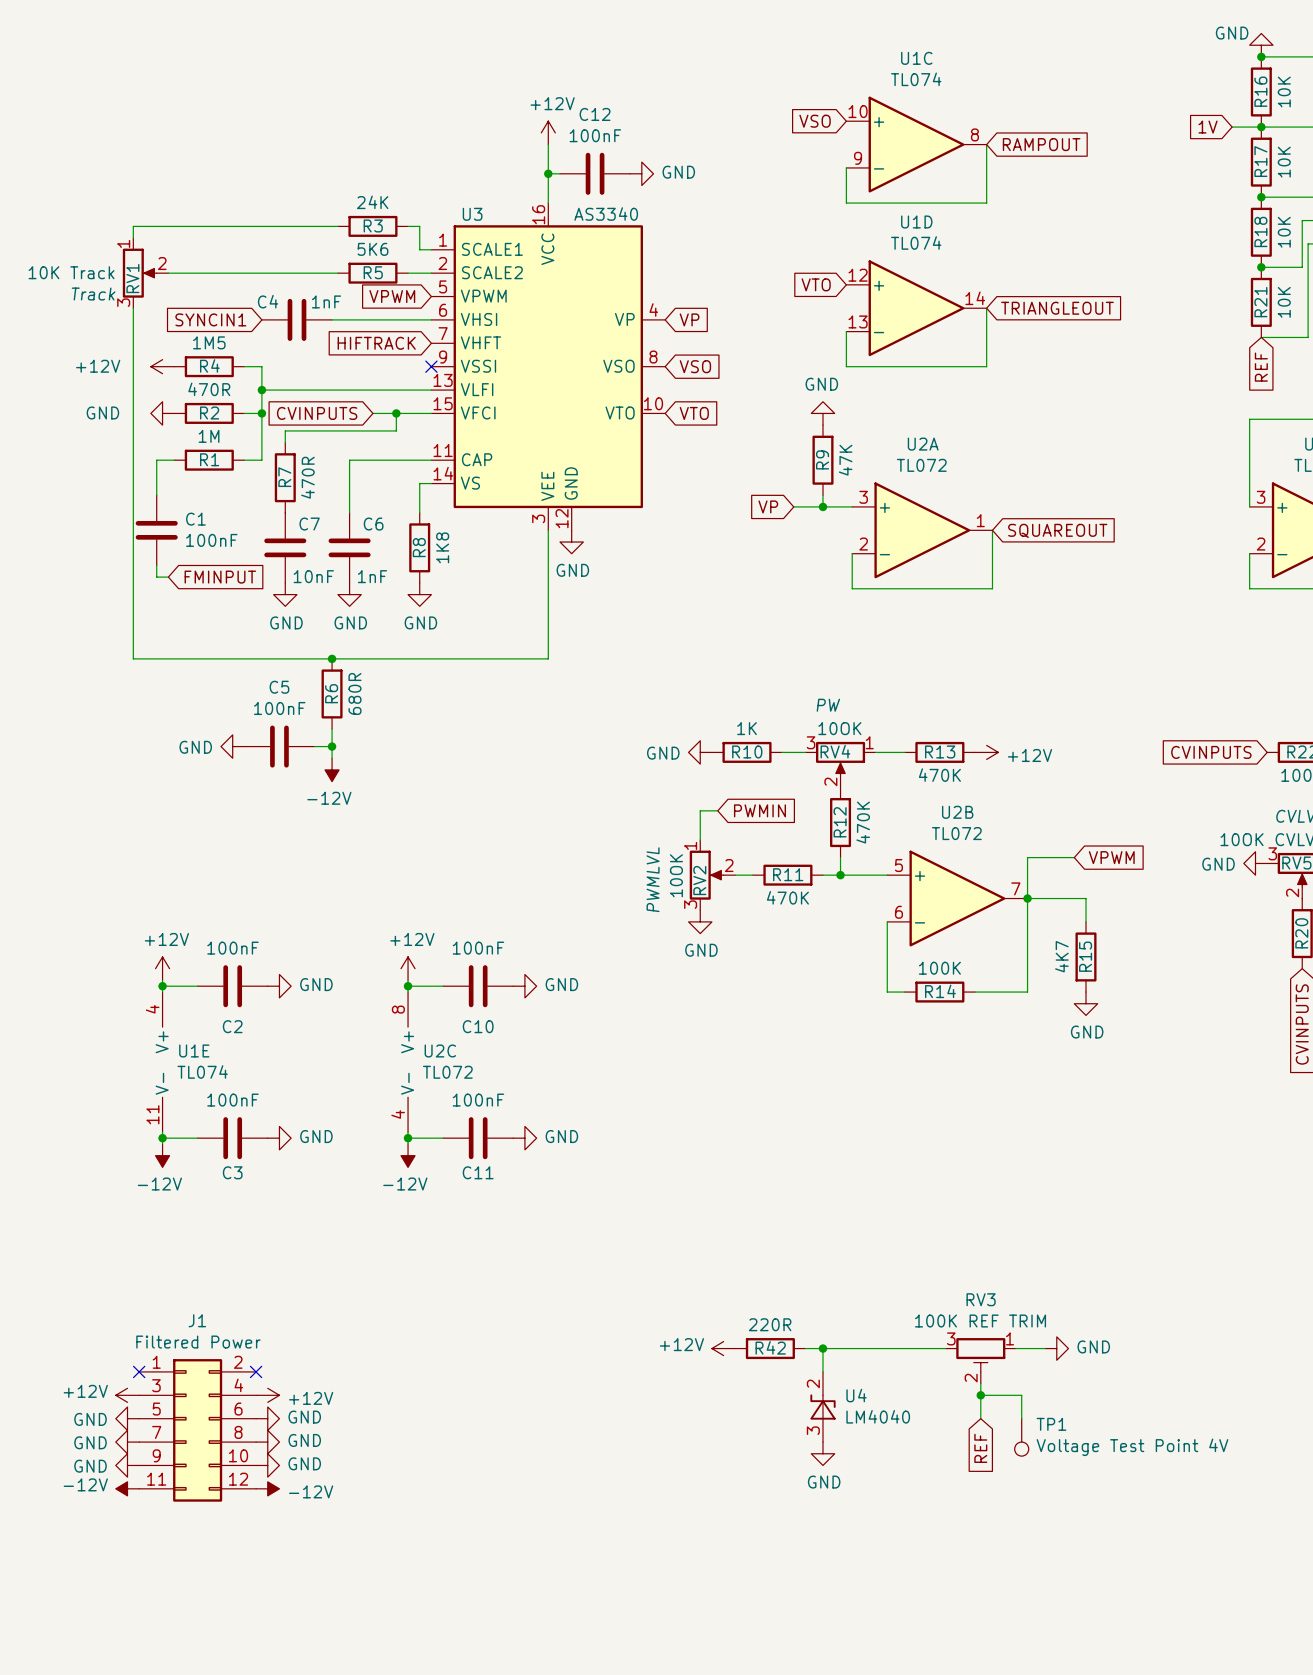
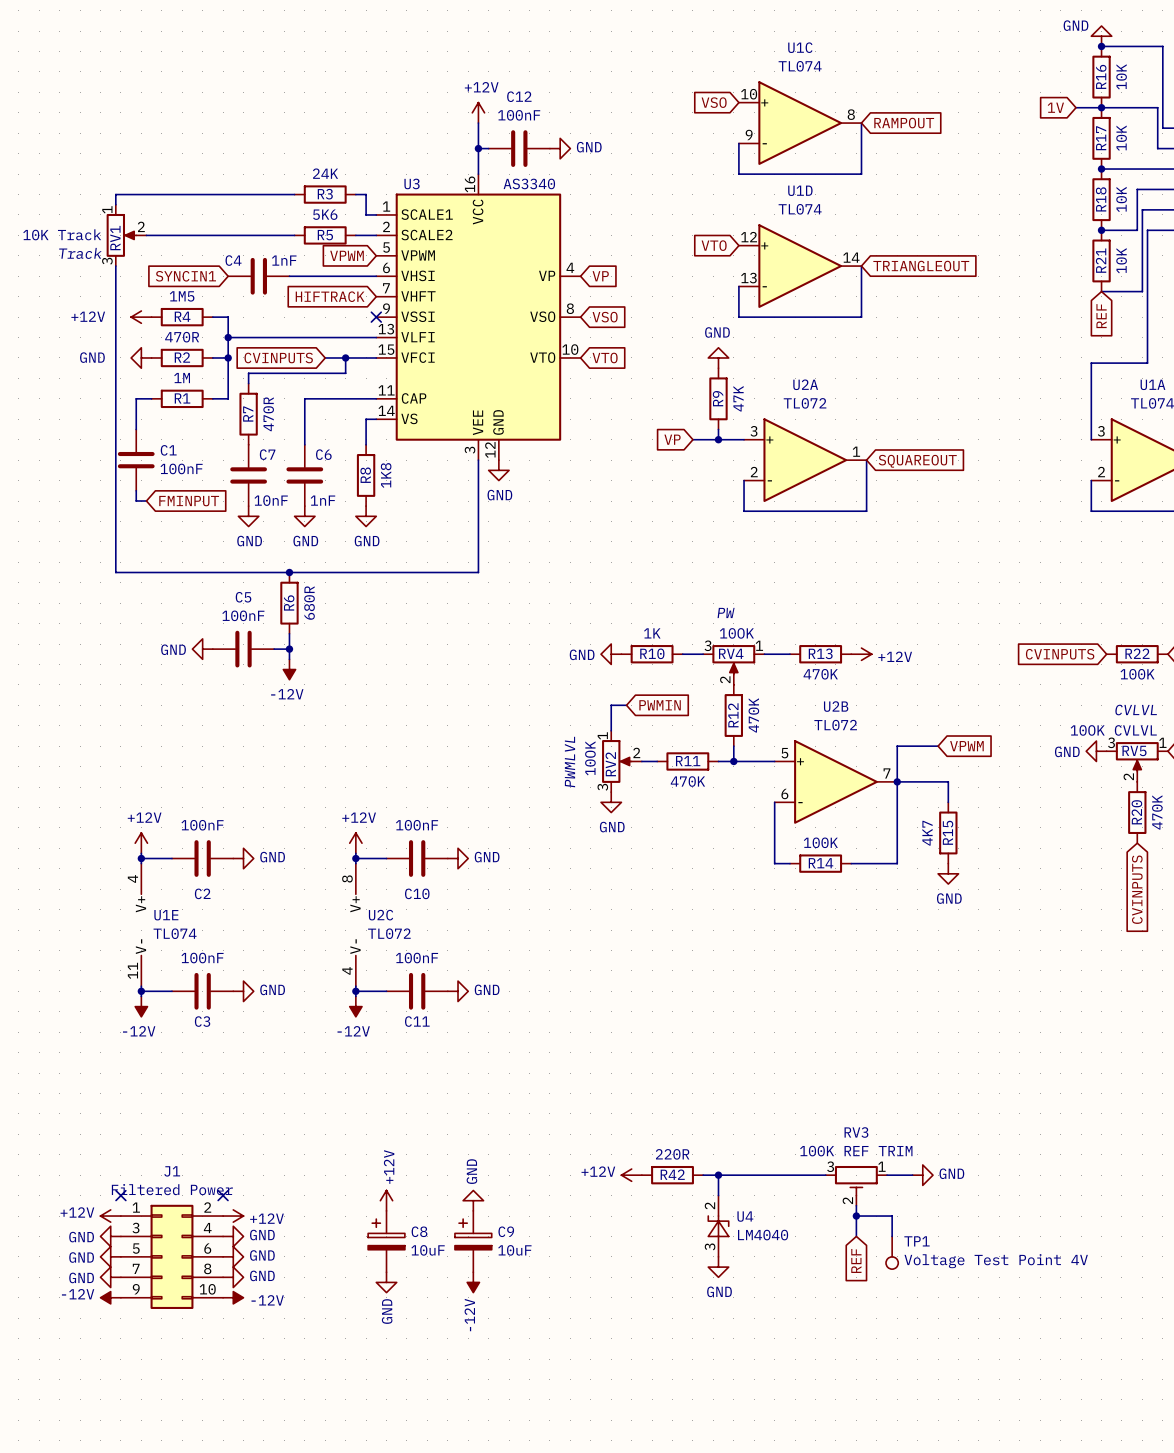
J1 symbol: [139, 1359, 257, 1502] -> [120, 1204, 224, 1309]
power symbol: none -> +12V (386, 1200)
power symbol: none -> GND (473, 1200)
C8: none -> 10uF (386, 1241)
C9: none -> 10uF (473, 1241)
power symbol: none -> GND (386, 1282)
power symbol: none -> -12V (473, 1282)

